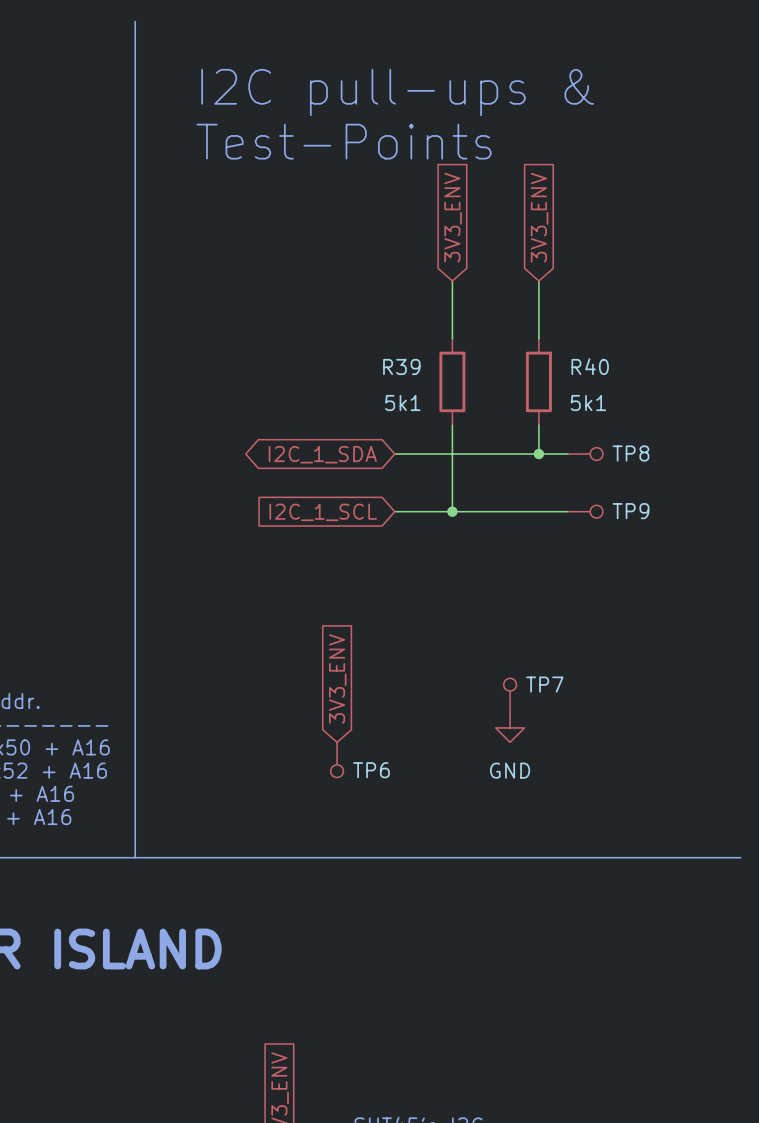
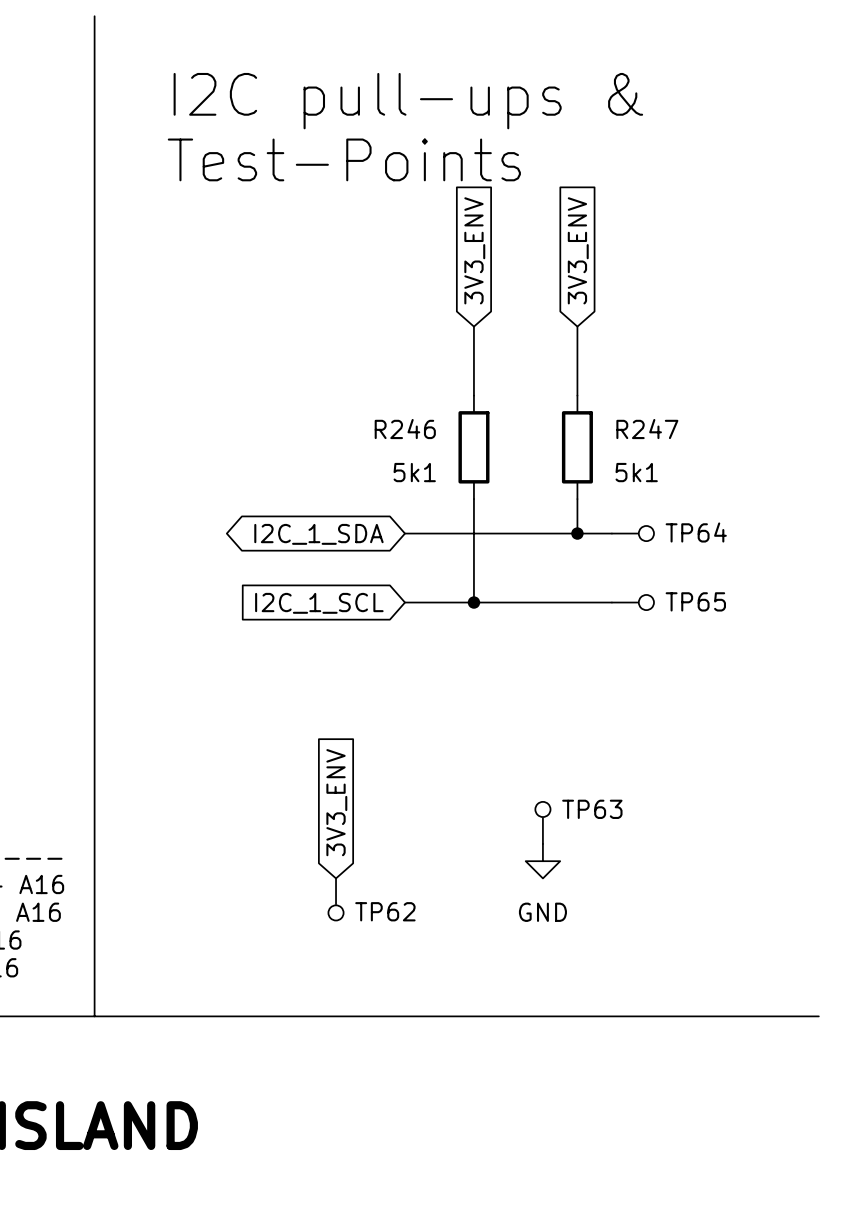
R39 name: R39 (401, 366) -> R246 (405, 429)
R40 name: R40 (590, 366) -> R247 (647, 429)
TP8 name: TP8 (631, 453) -> TP64 (696, 532)
TP9 name: TP9 (631, 511) -> TP65 (695, 601)
TP7 name: TP7 (544, 684) -> TP63 (592, 809)
TP6 name: TP6 (371, 770) -> TP62 (385, 911)

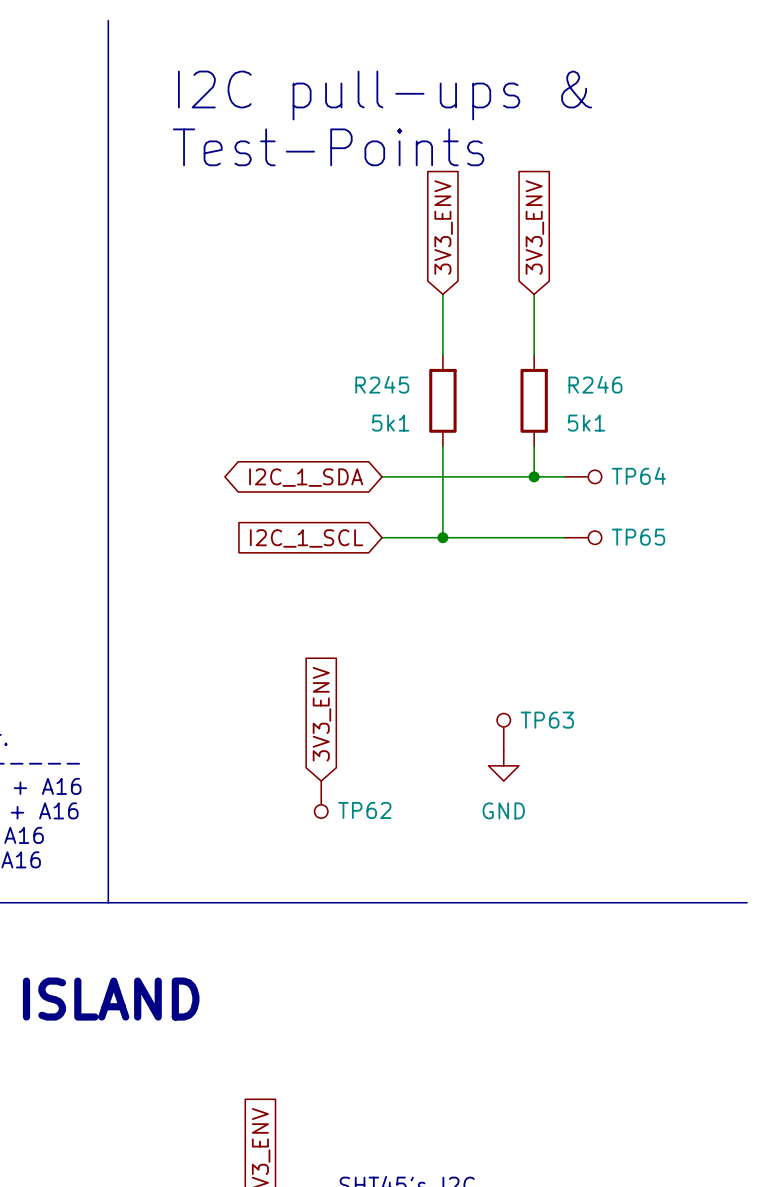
R246 name: R246 (405, 429) -> R245 (382, 384)
R247 name: R247 (647, 429) -> R246 (595, 384)

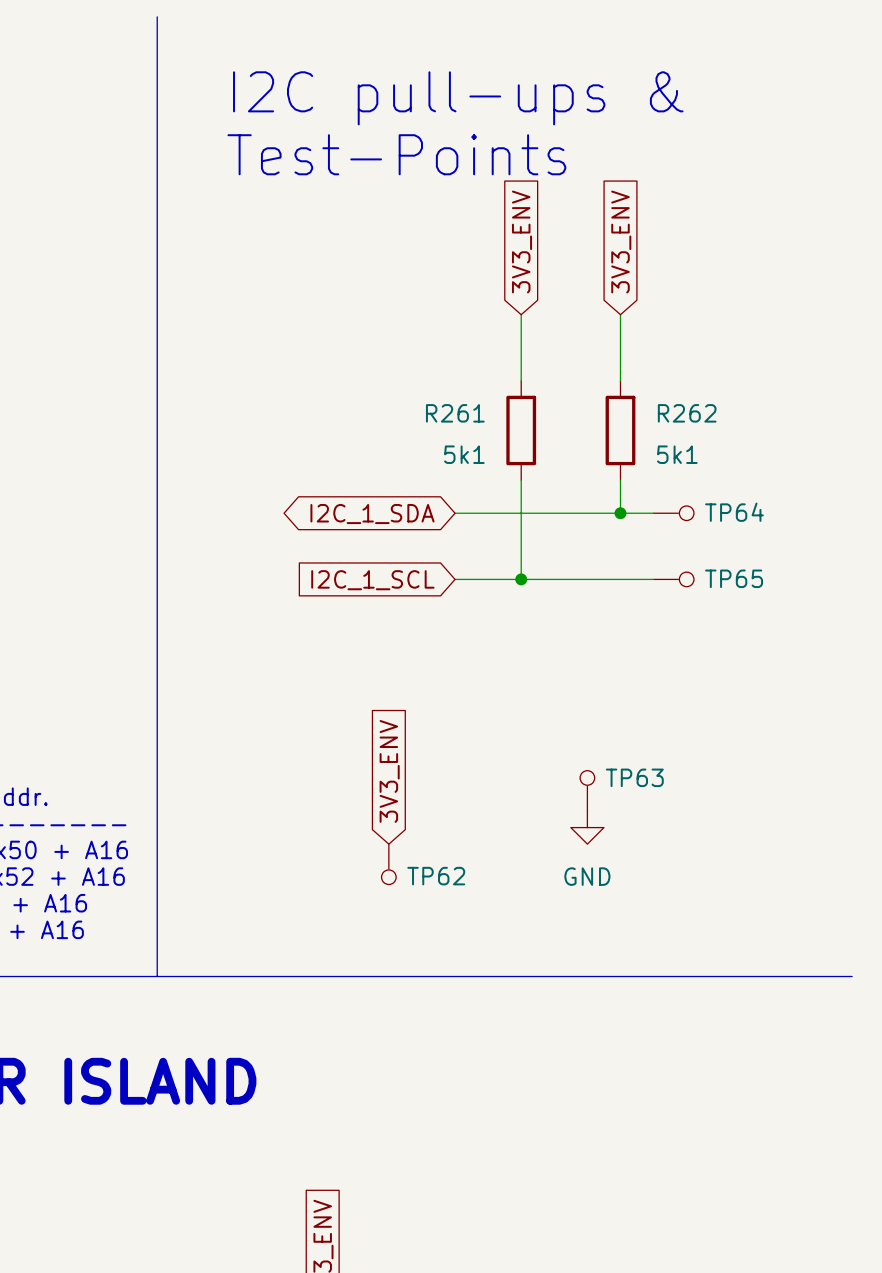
R245 name: R245 (382, 384) -> R261 (455, 413)
R246 name: R246 (595, 384) -> R262 (687, 413)

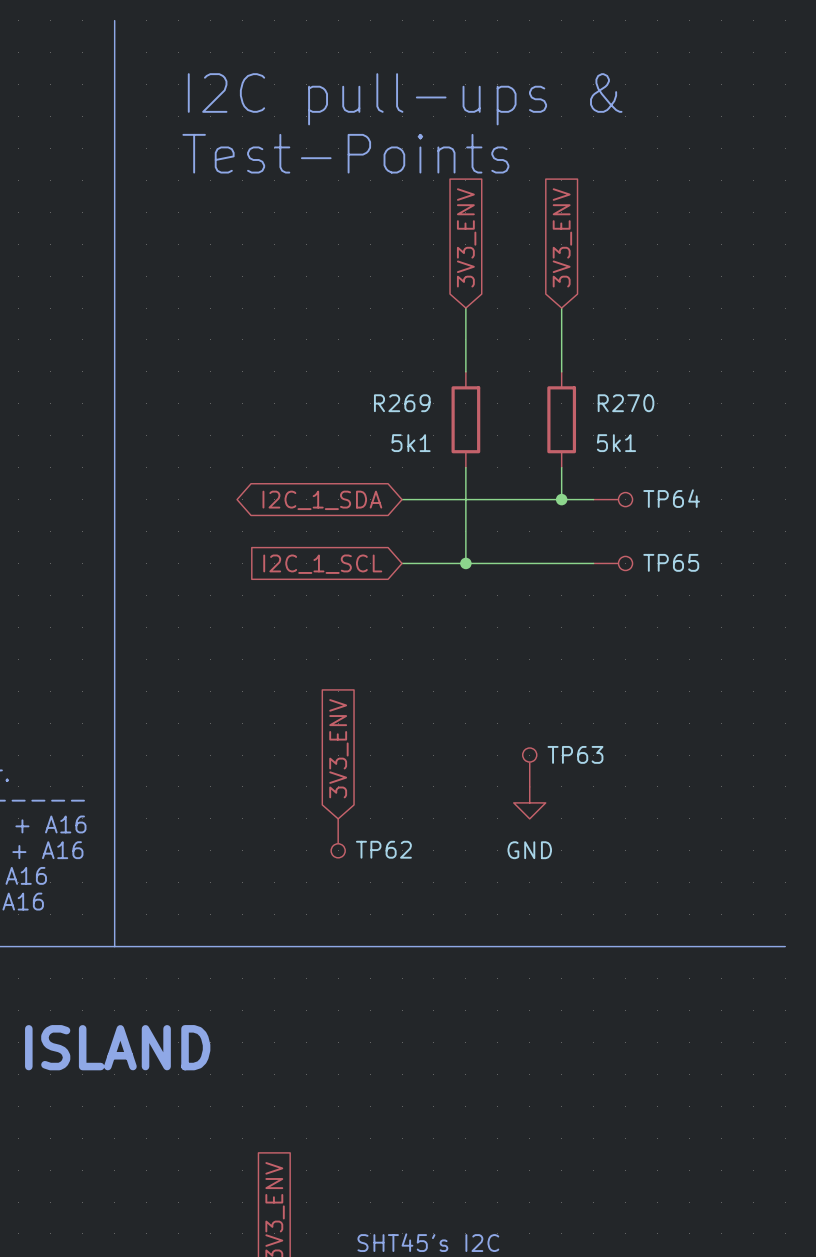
R261 name: R261 (455, 413) -> R269 (402, 403)
R262 name: R262 (687, 413) -> R270 (626, 403)

